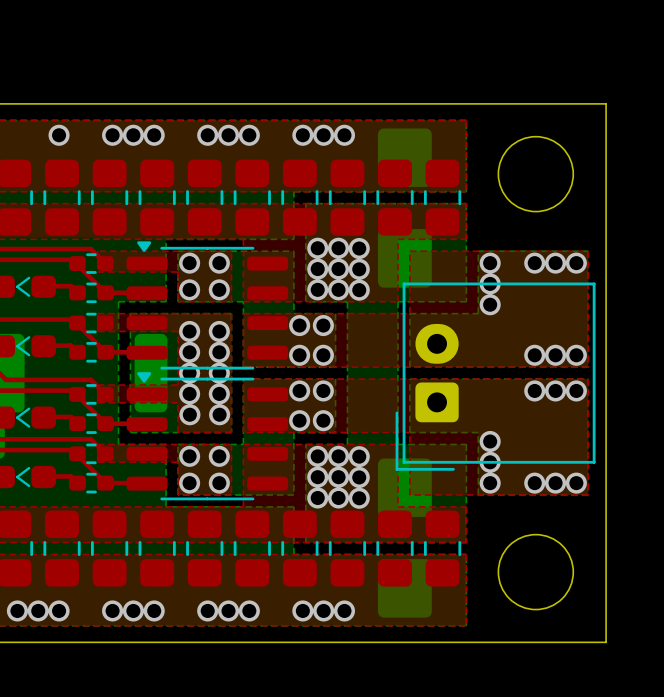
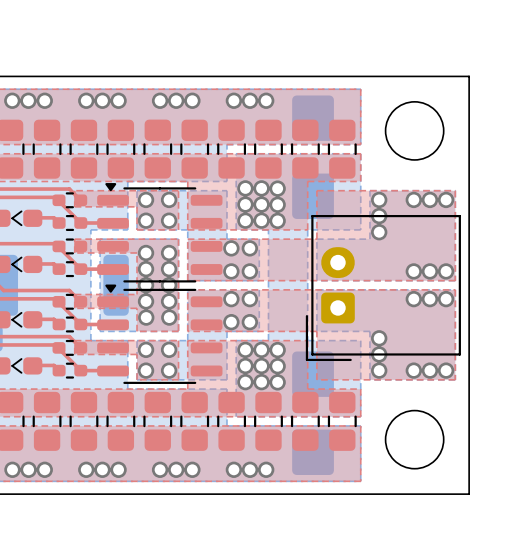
via: none -> (12, 100)
via: none -> (28, 100)

